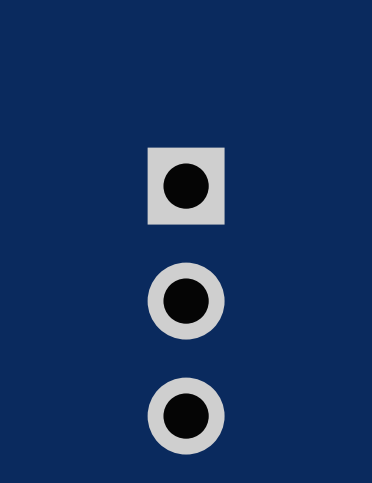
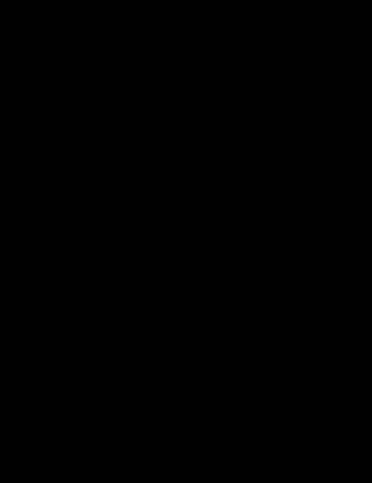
part: (186, 301) -> none

